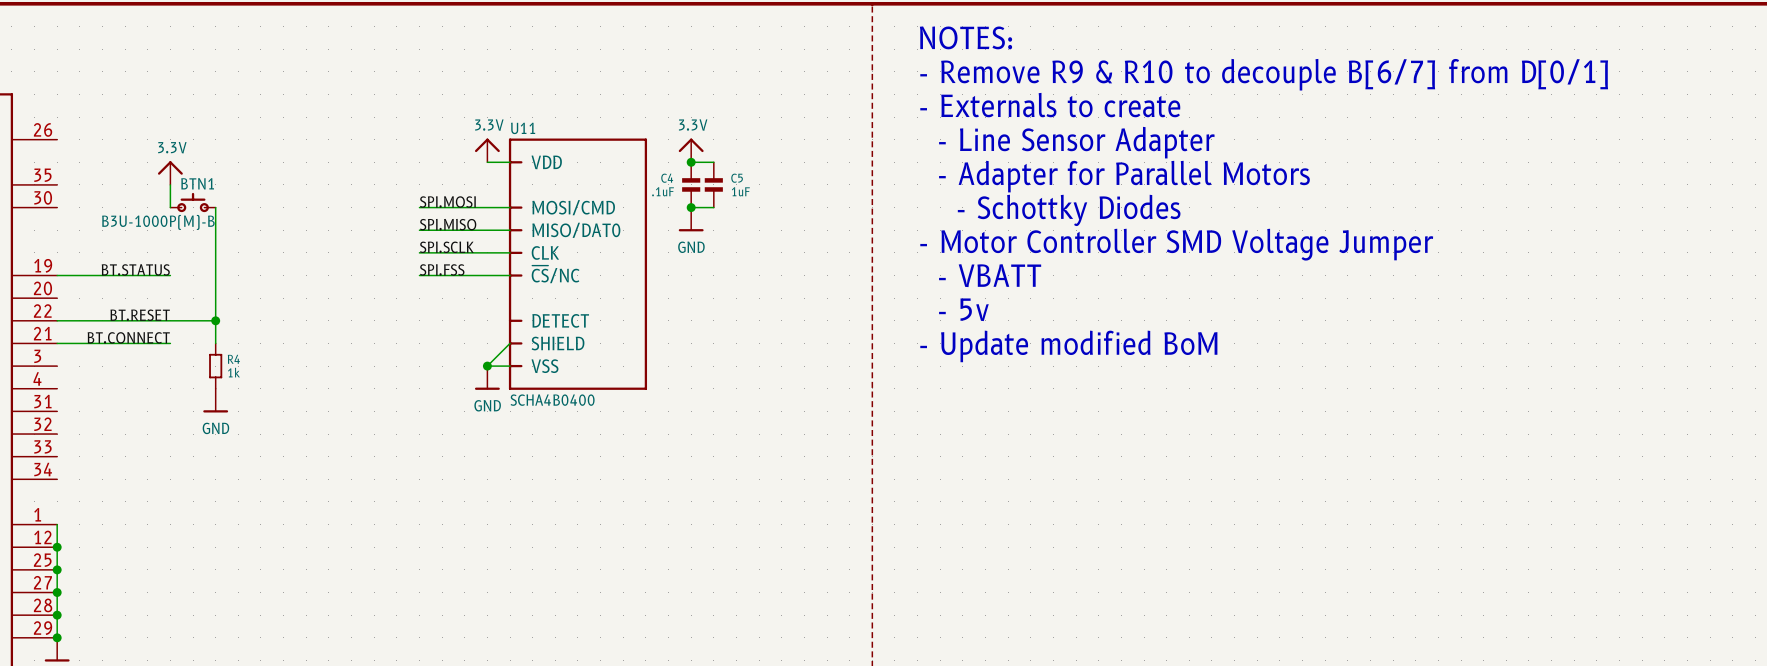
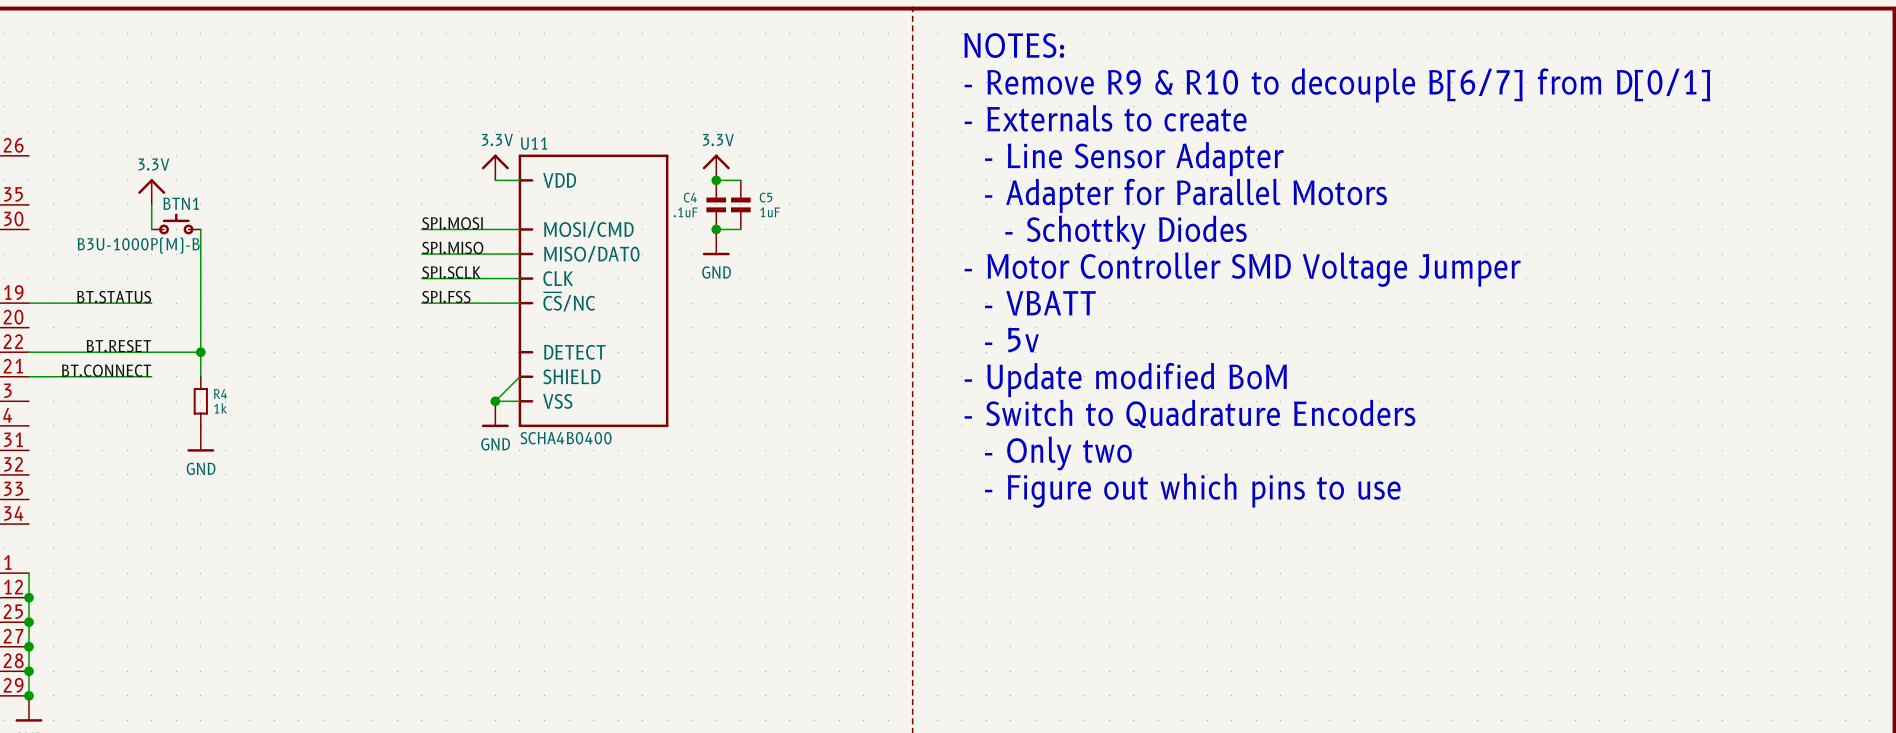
text: none -> - Switch to Quadrature Encoders (1189, 413)
text: none -> - Only two (1058, 453)
text: none -> - Figure out which pins to use (1192, 490)

